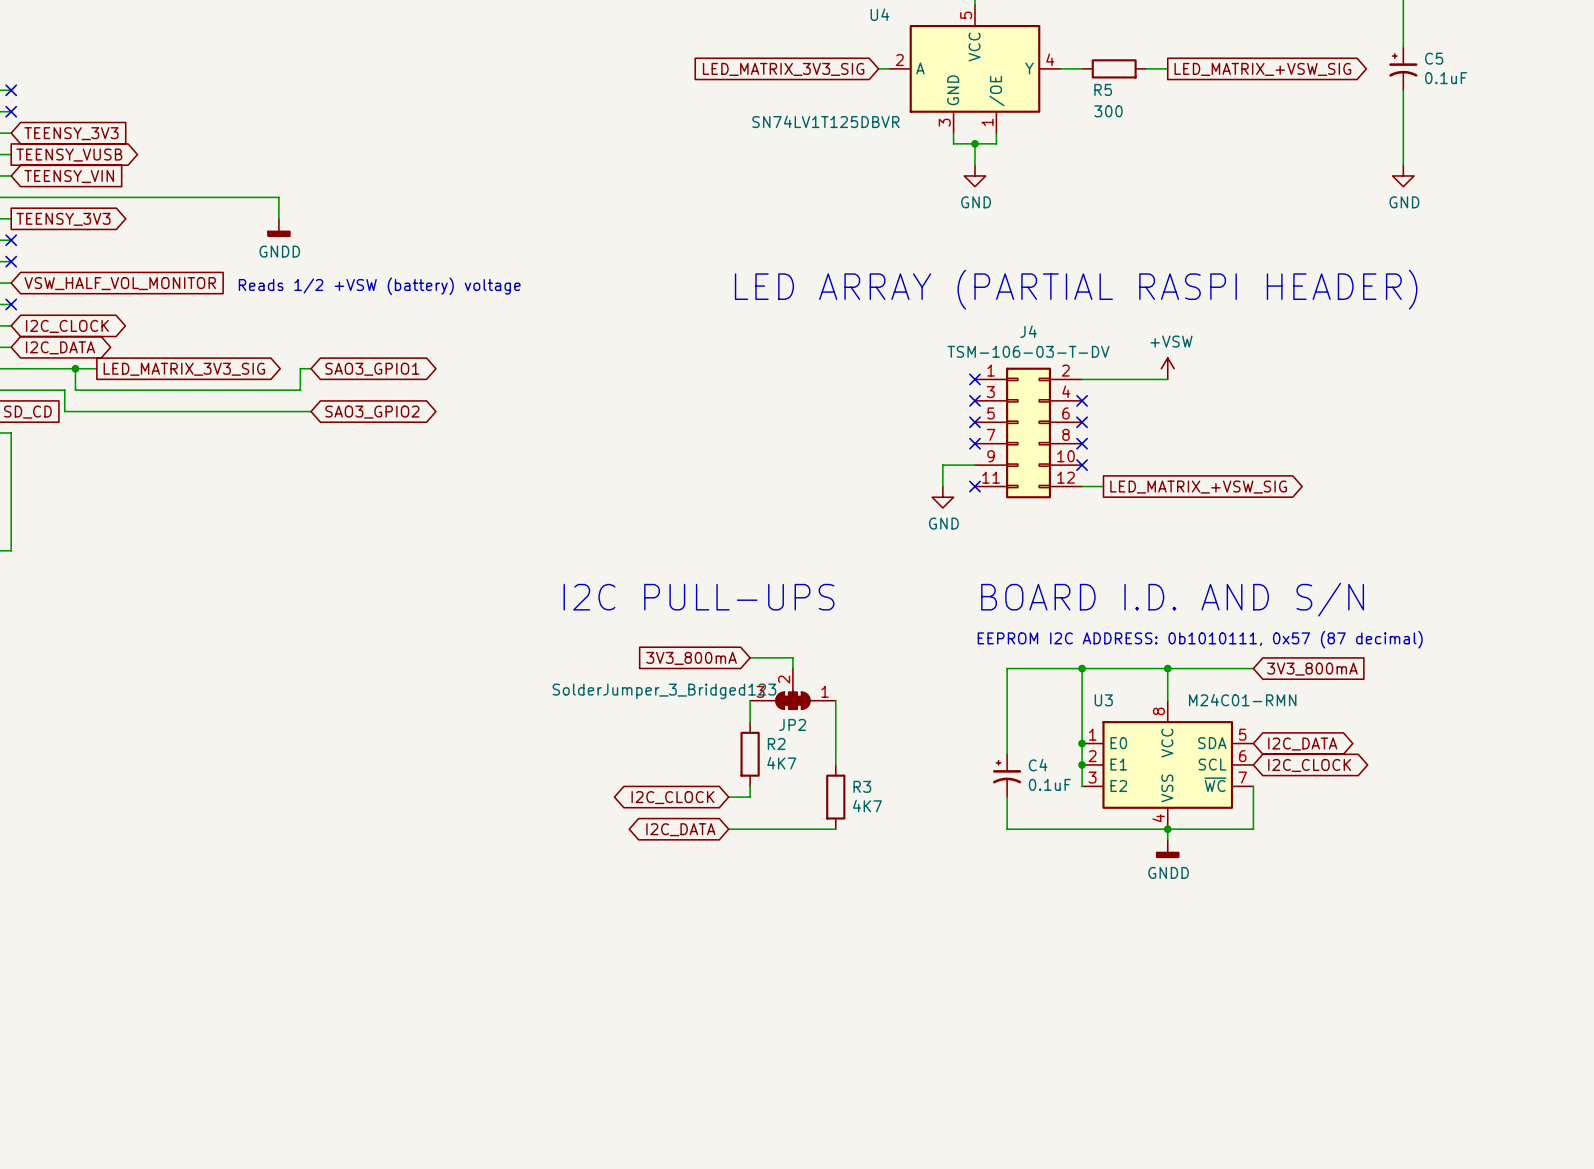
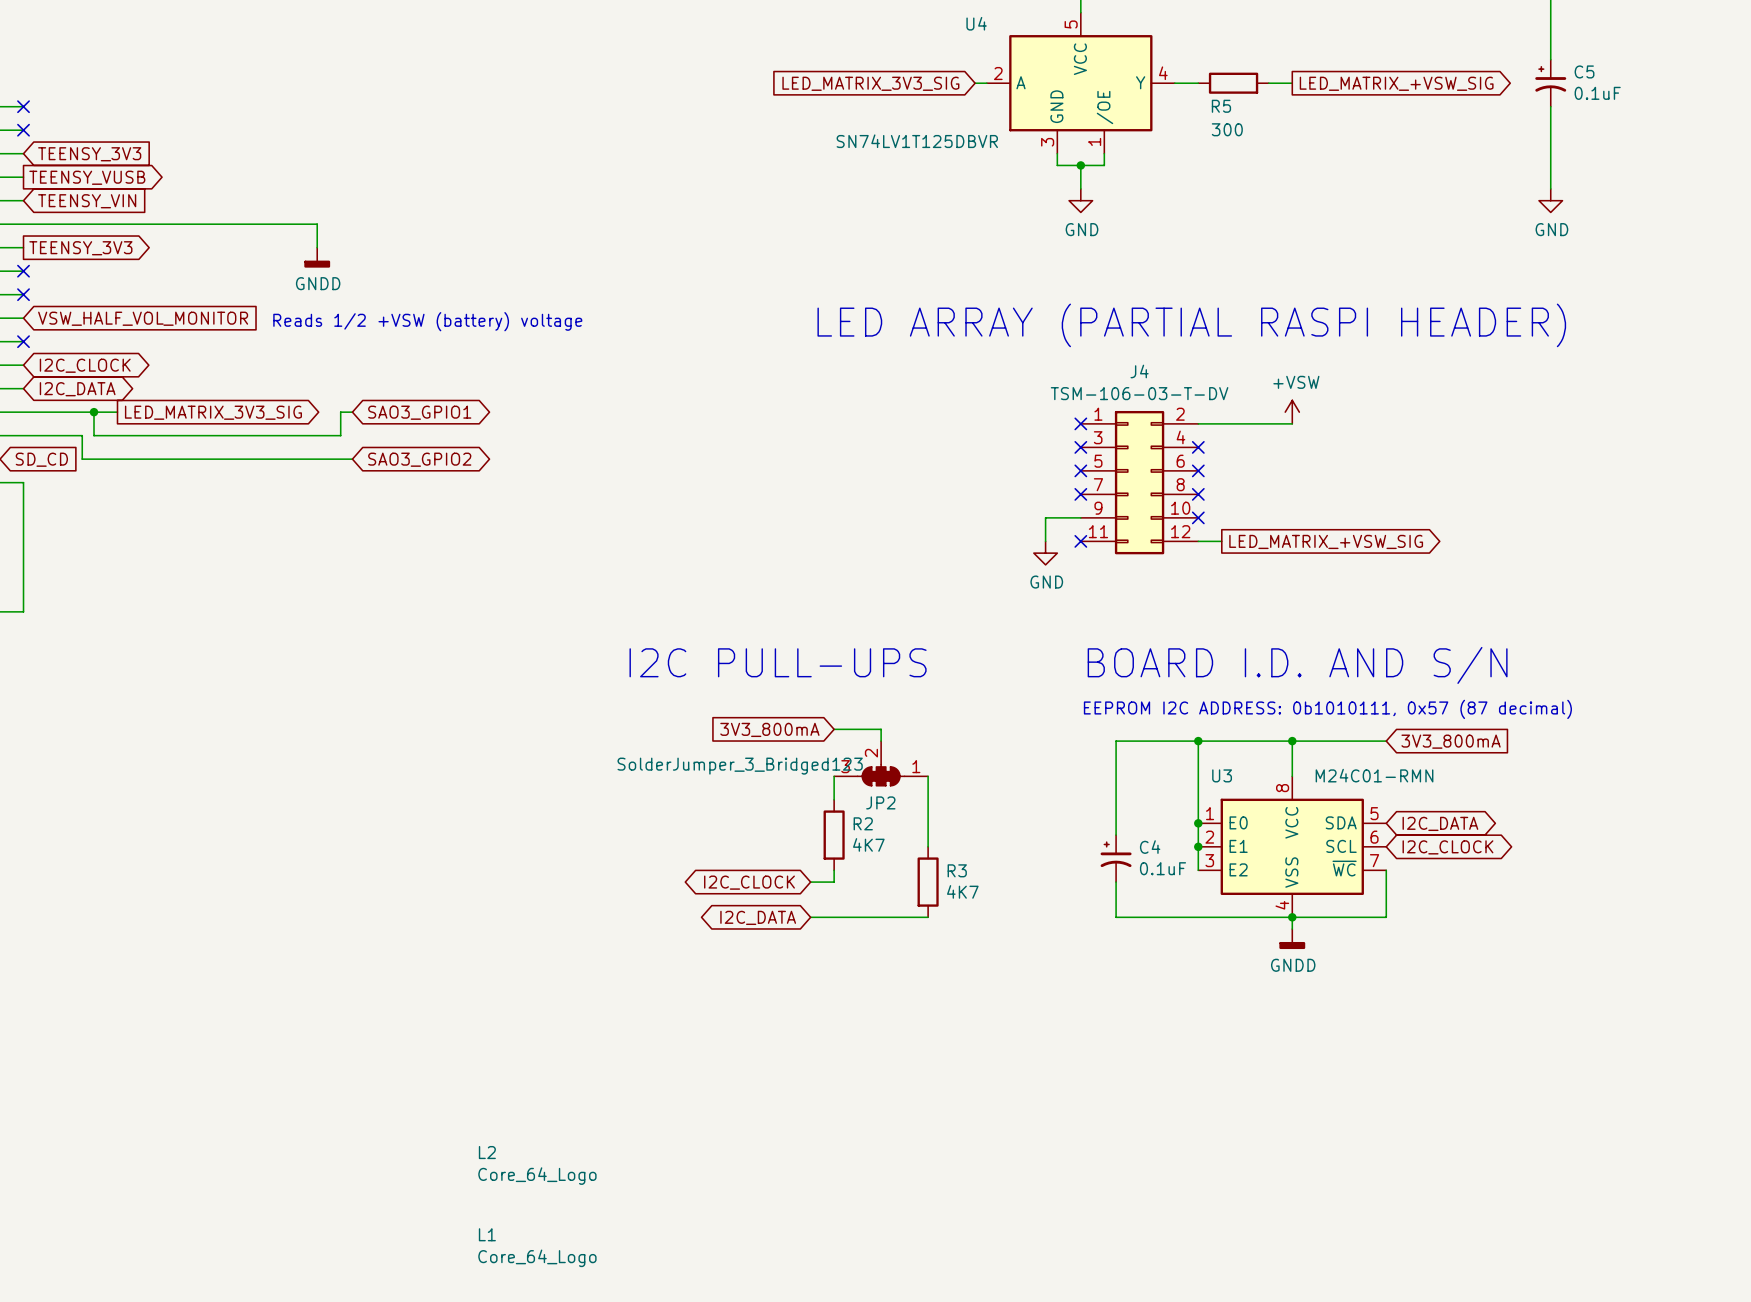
L2: none -> Core_64_Logo (537, 1165)
L1: none -> Core_64_Logo (537, 1247)

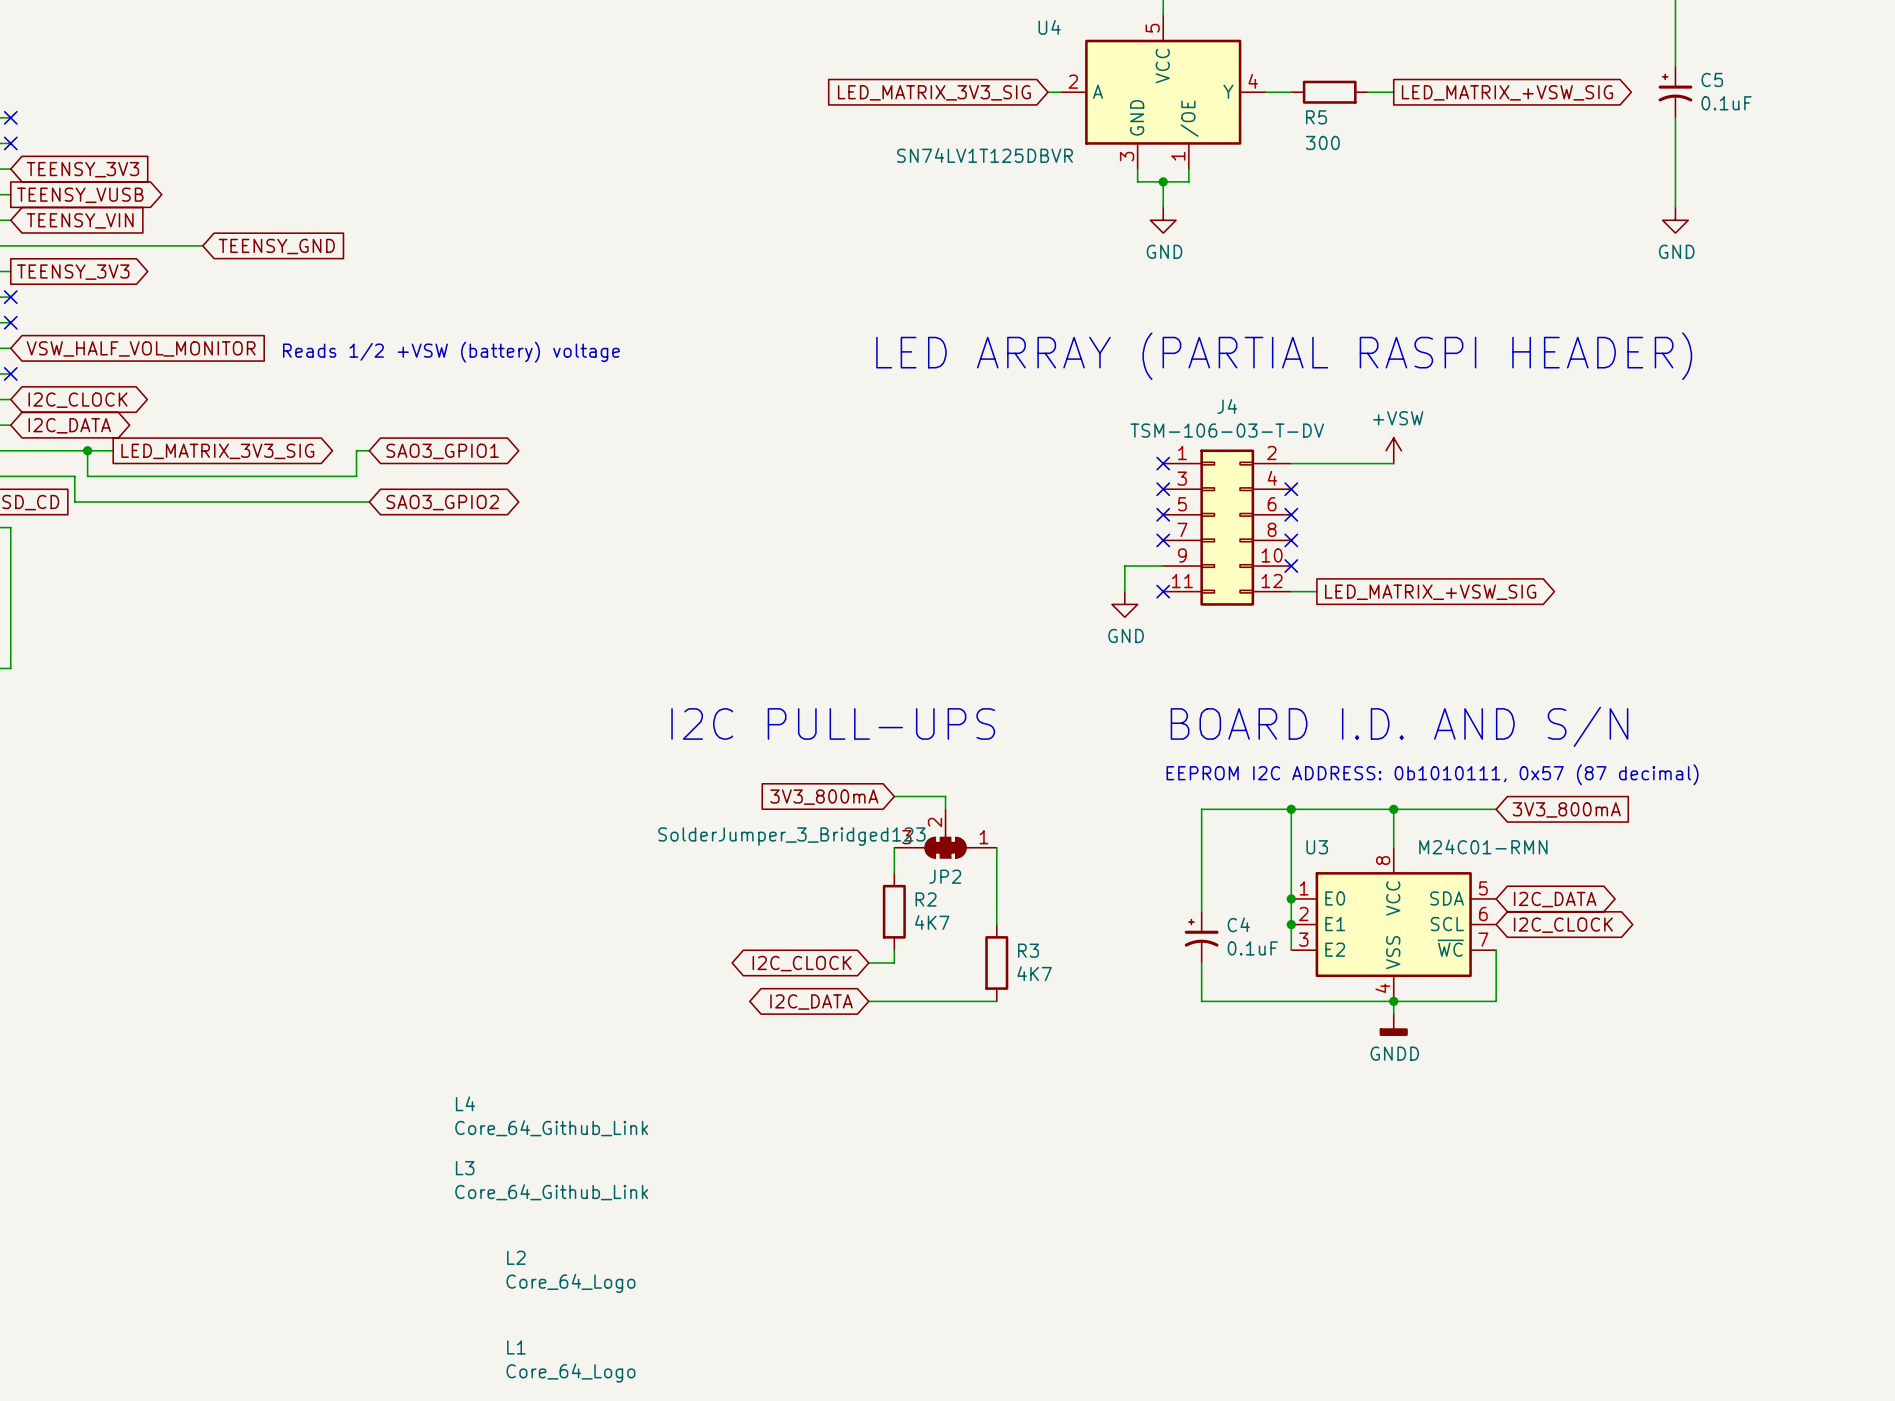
wire: (199, 224) (317, 224) (317, 247) -> none
global label: none -> TEENSY_GND (276, 246)
power symbol: GNDD (317, 257) -> none
L4: none -> Core_64_Github_Link (551, 1116)
L3: none -> Core_64_Github_Link (551, 1180)

